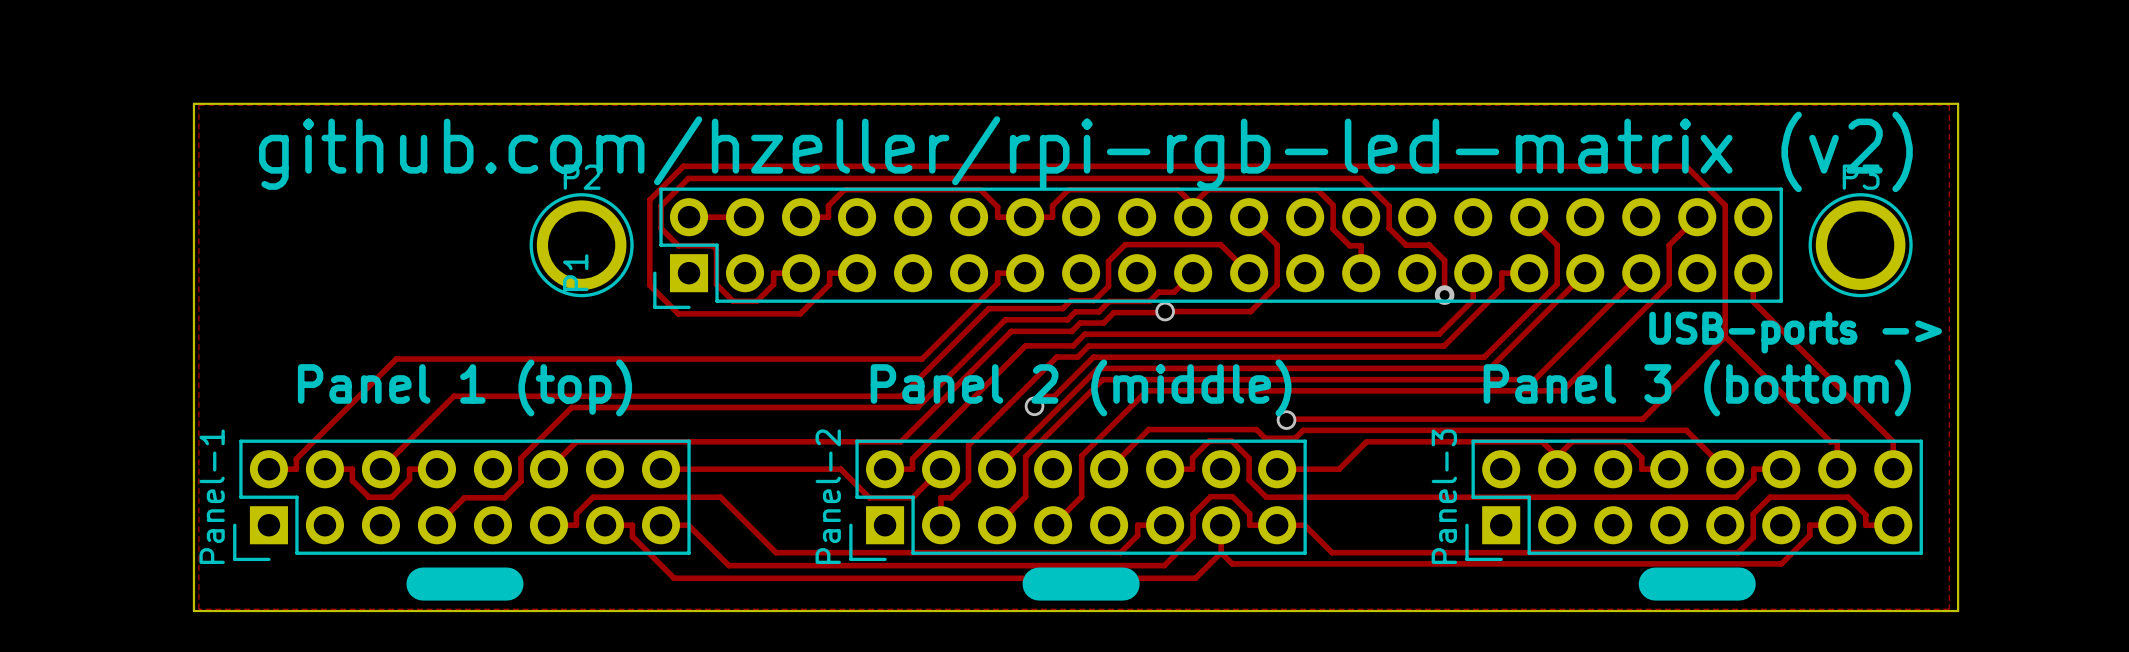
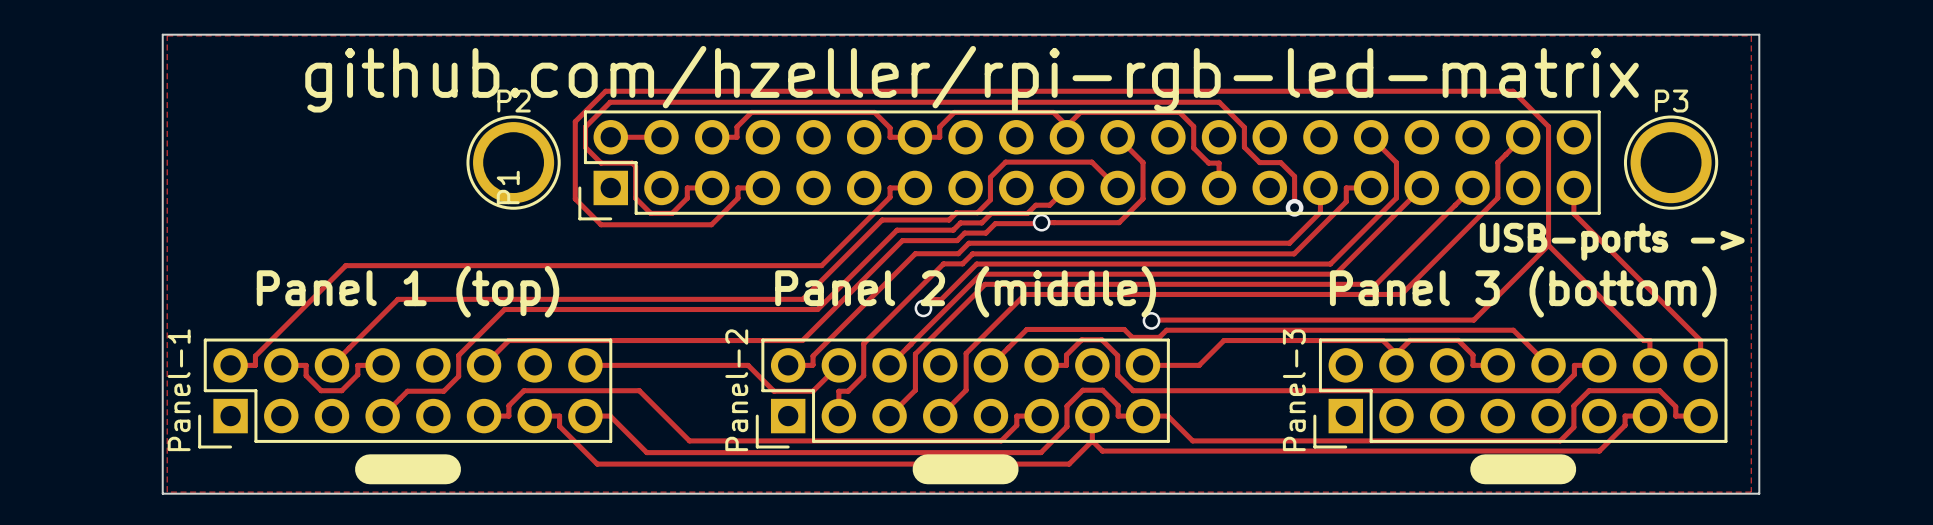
text: github.com/hzeller/rpi-rgb-led-matrix (v2) (1085, 151) -> github.com/hzeller/rpi-rgb-led-matrix (972, 79)

